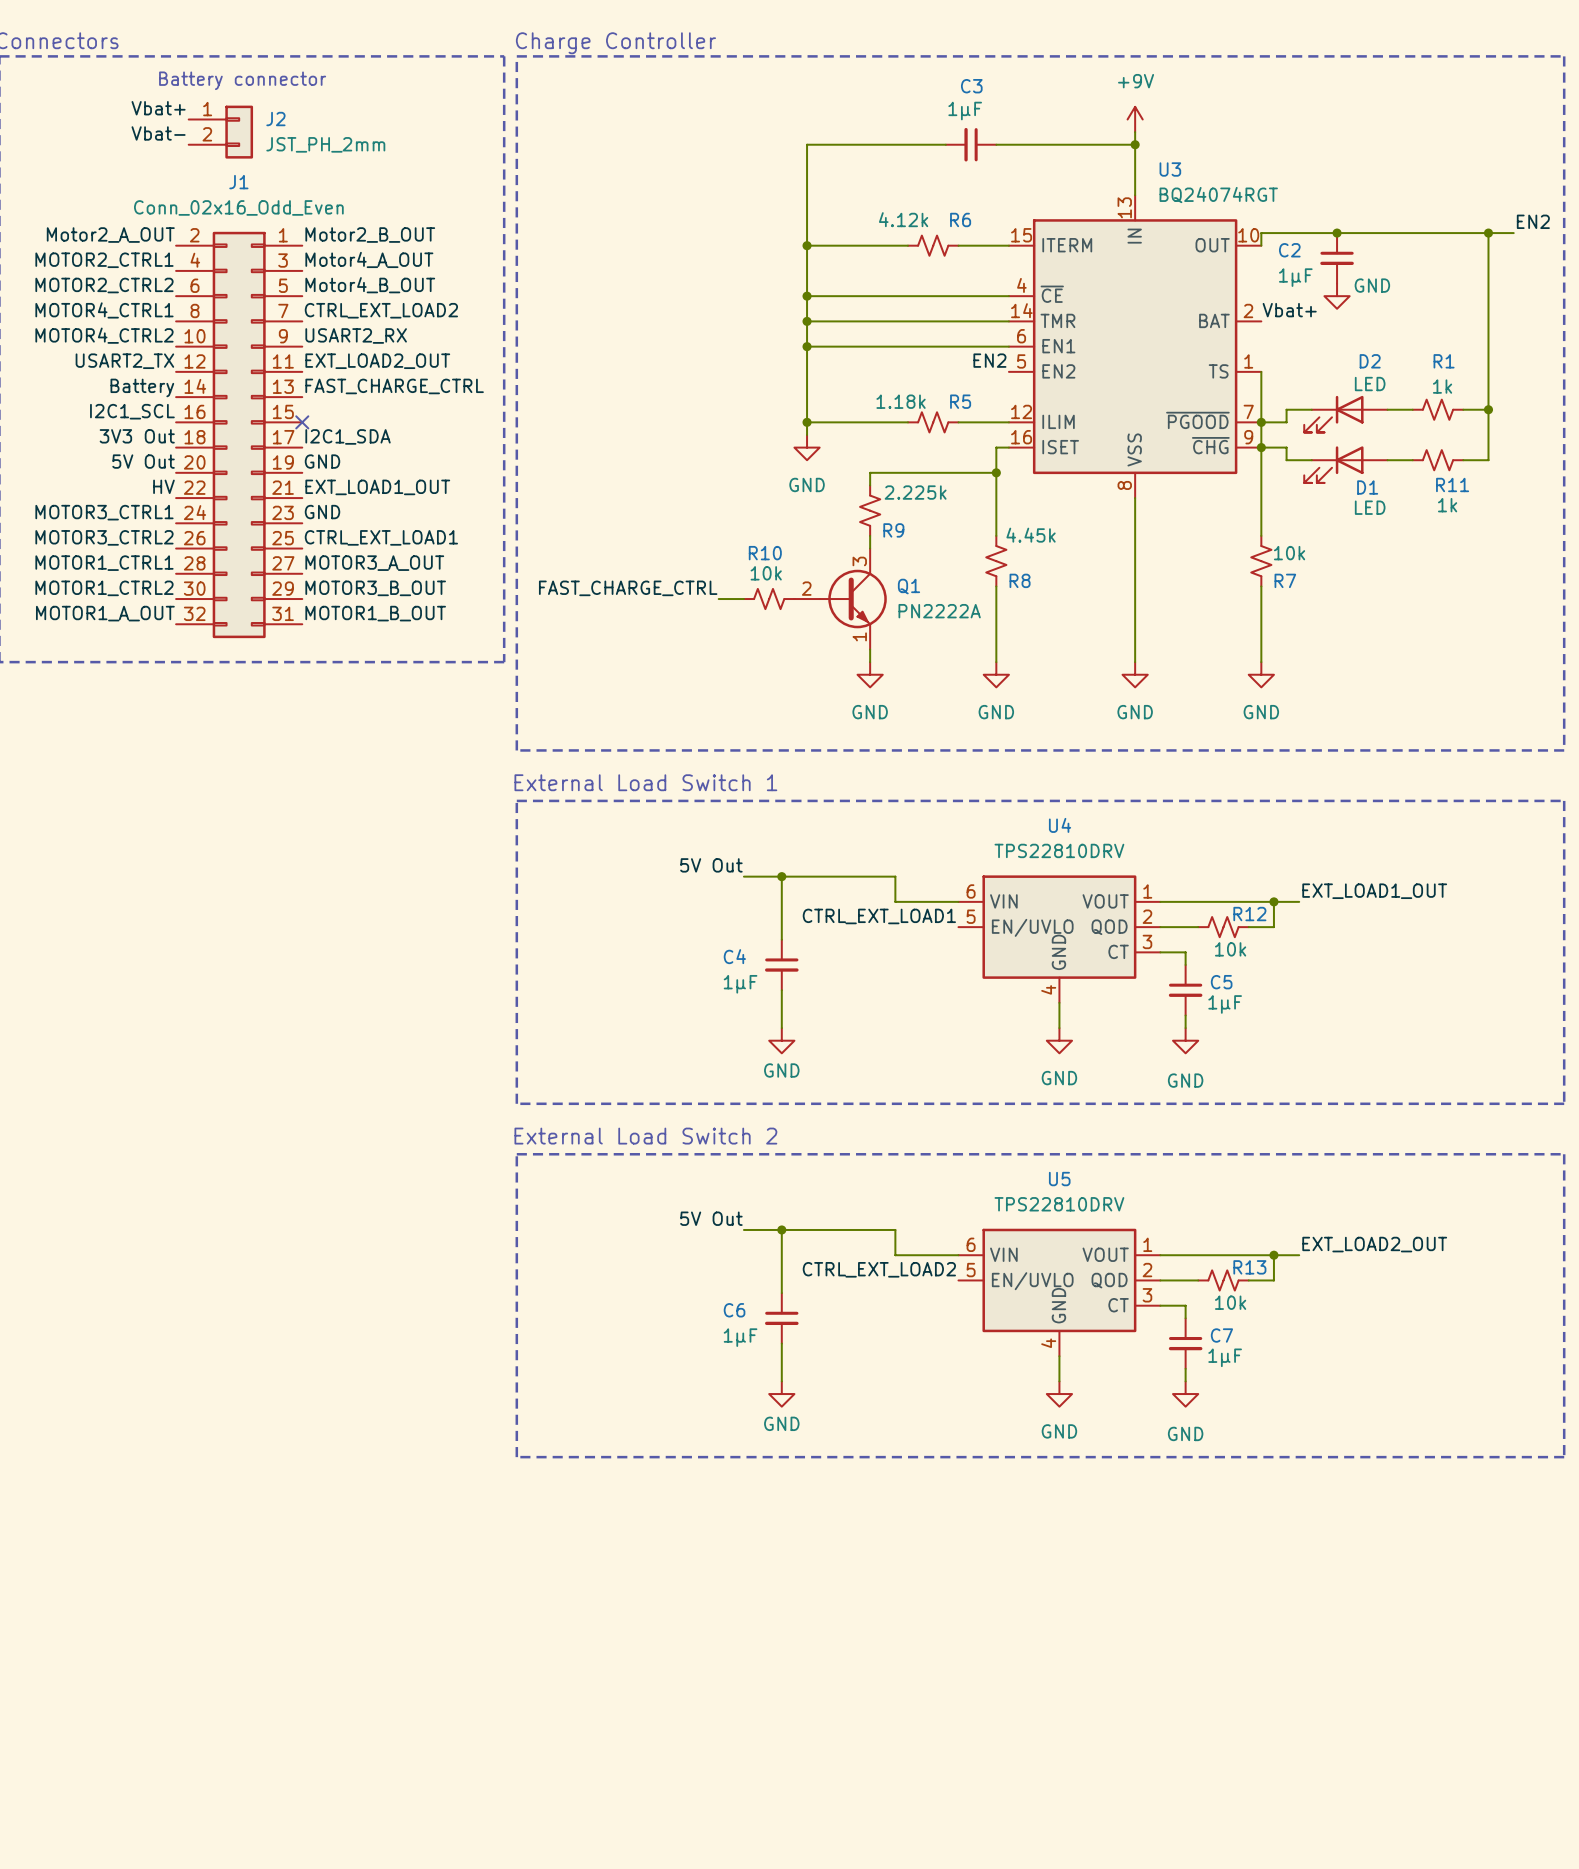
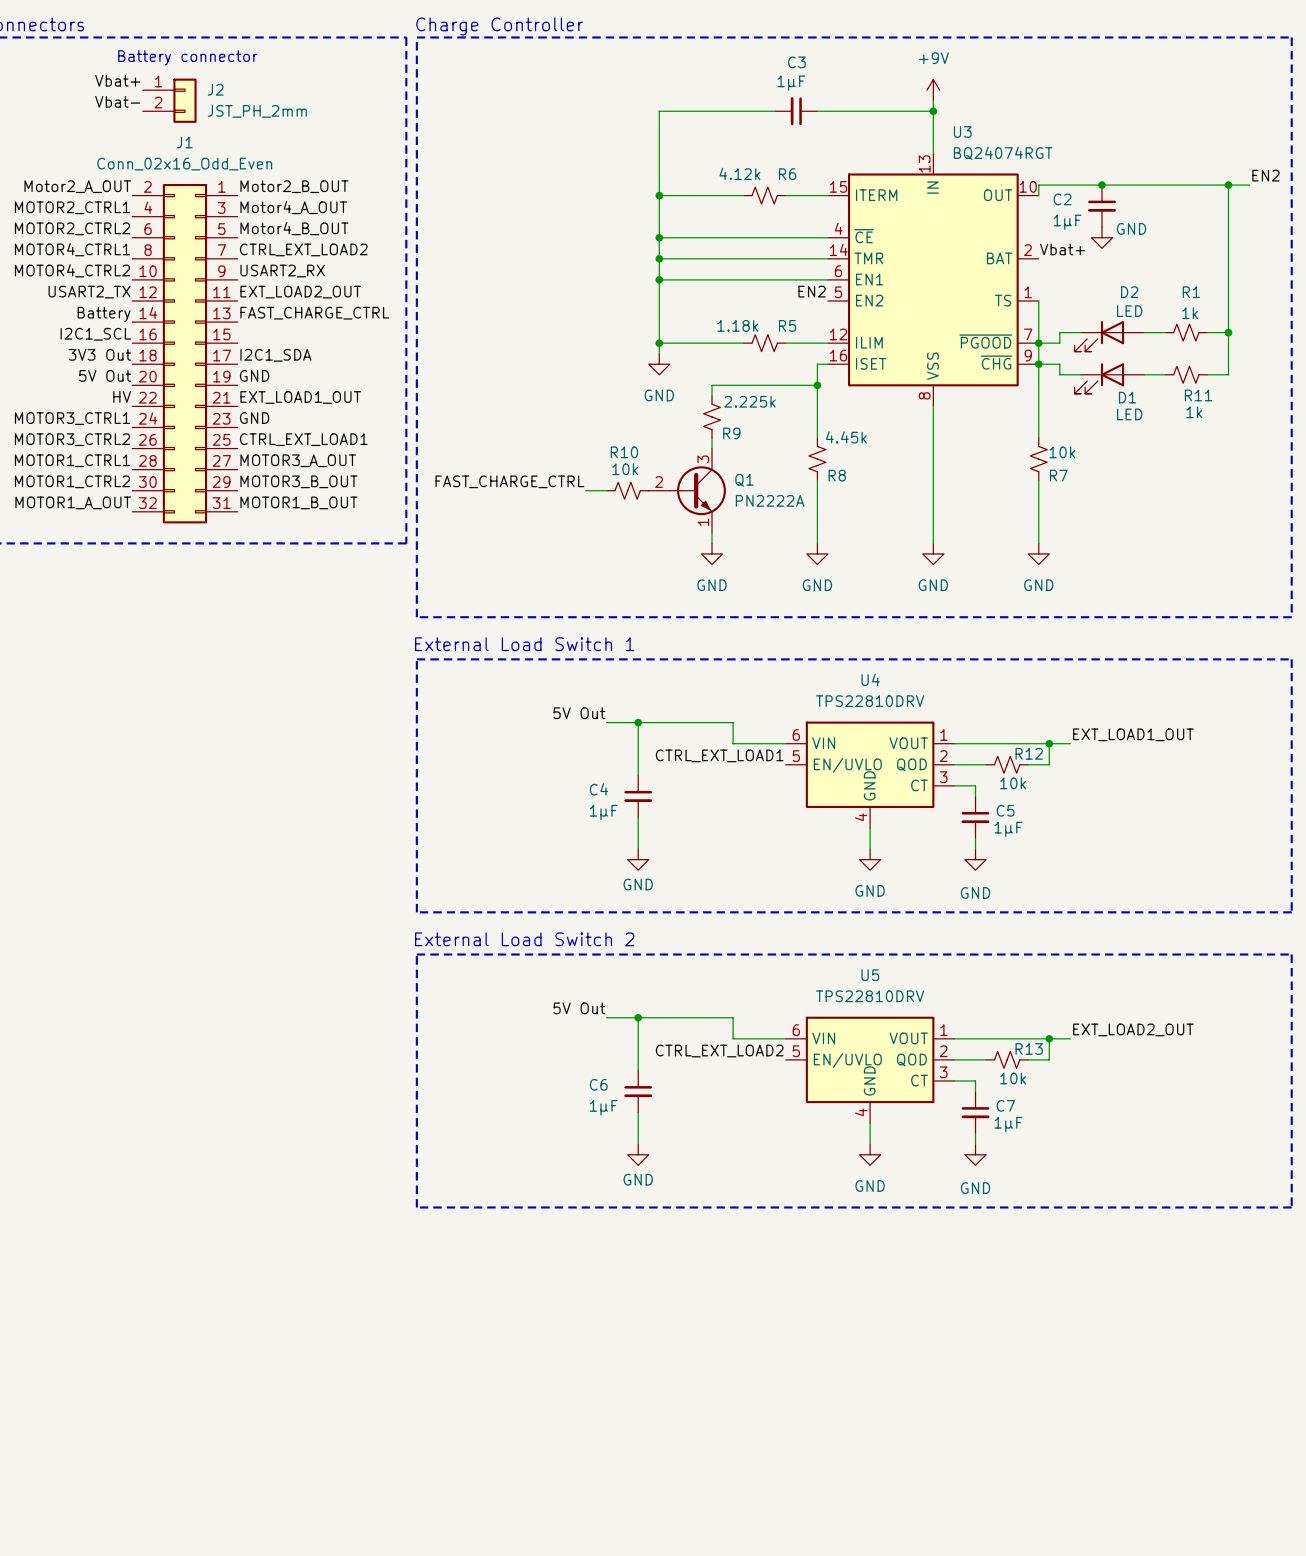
no-connect mark: (302, 422) -> none

